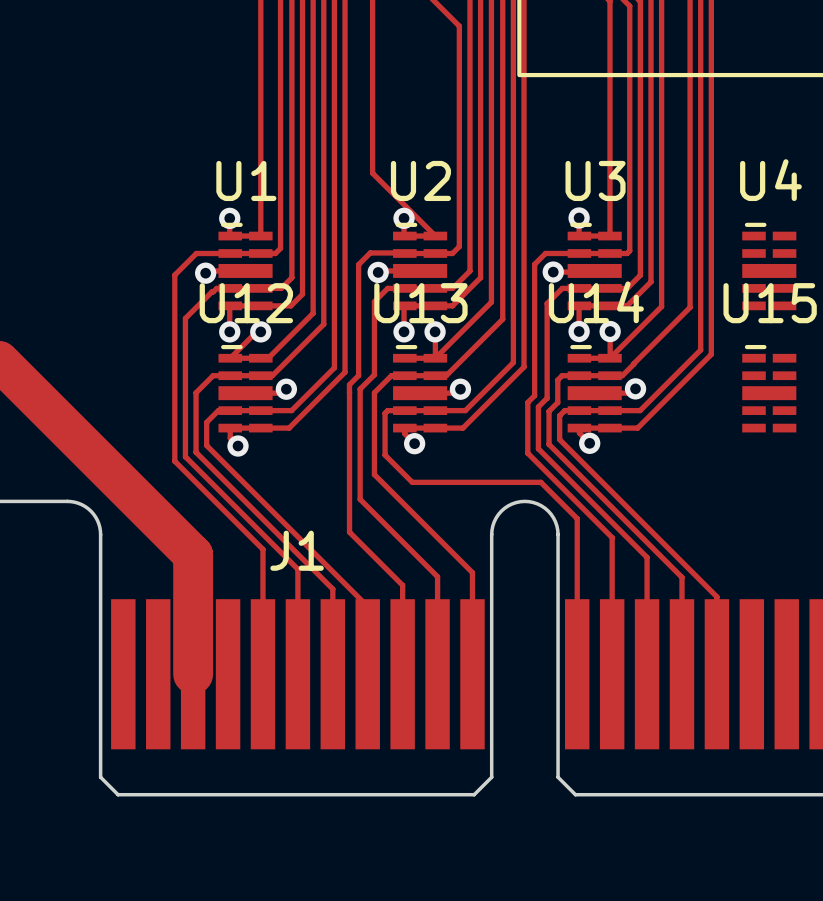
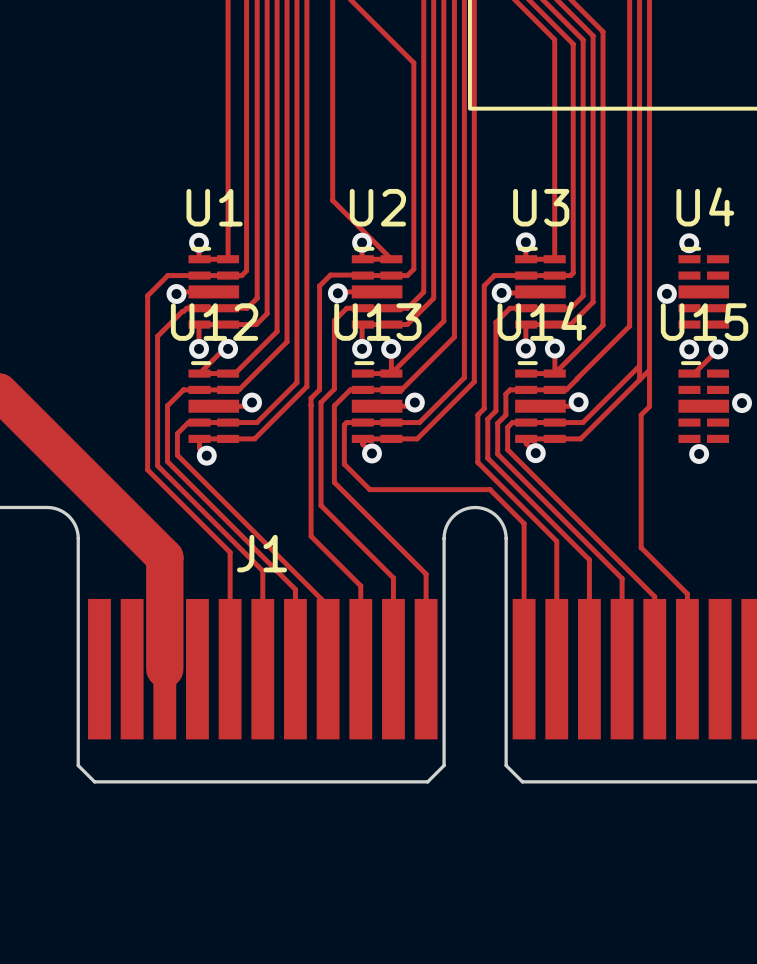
via: none -> (689, 243)
via: none -> (666, 293)
via: none -> (689, 349)
track: none -> (718, 349) (694, 373)
via: none -> (718, 349)
track: none -> (649, 370) (649, 406) (641, 414) (641, 547) (687, 593) (687, 669)
via: none -> (742, 403)
via: none -> (699, 454)

